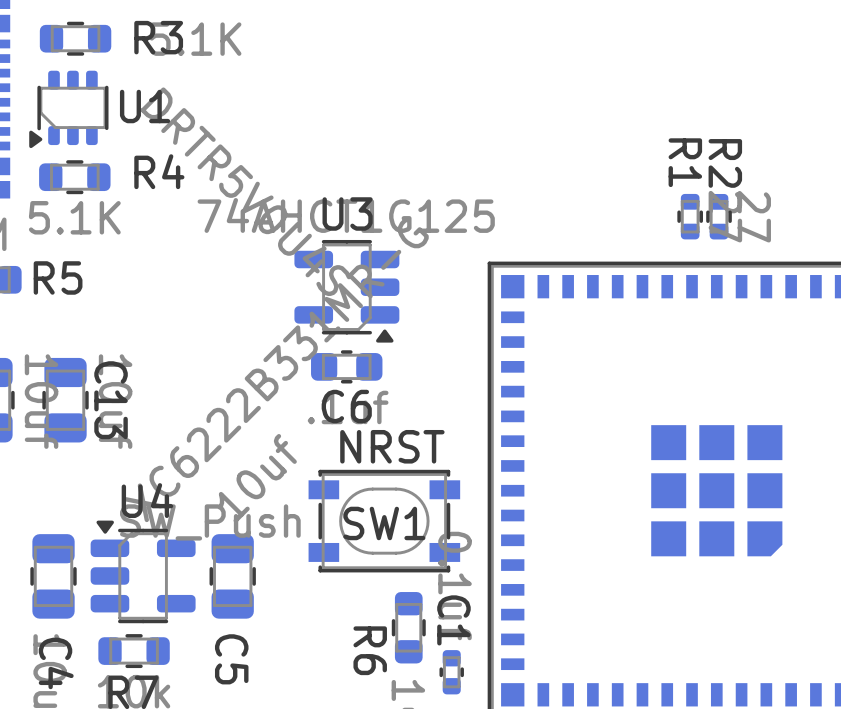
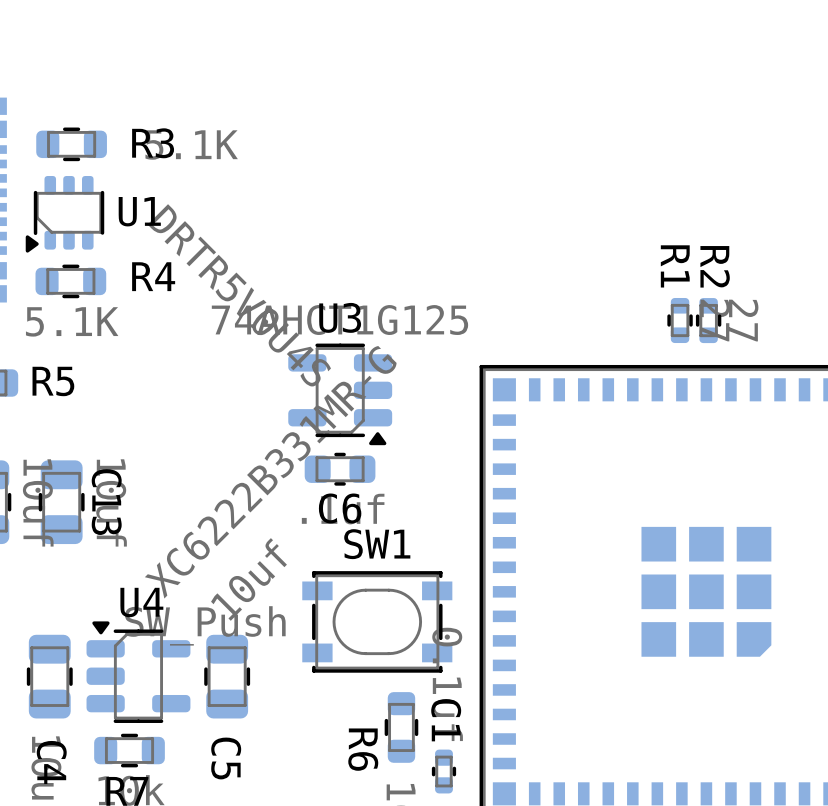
text: NRST (392, 446) -> none
SW1 name position: SW1 (384, 523) -> SW1 (377, 544)

